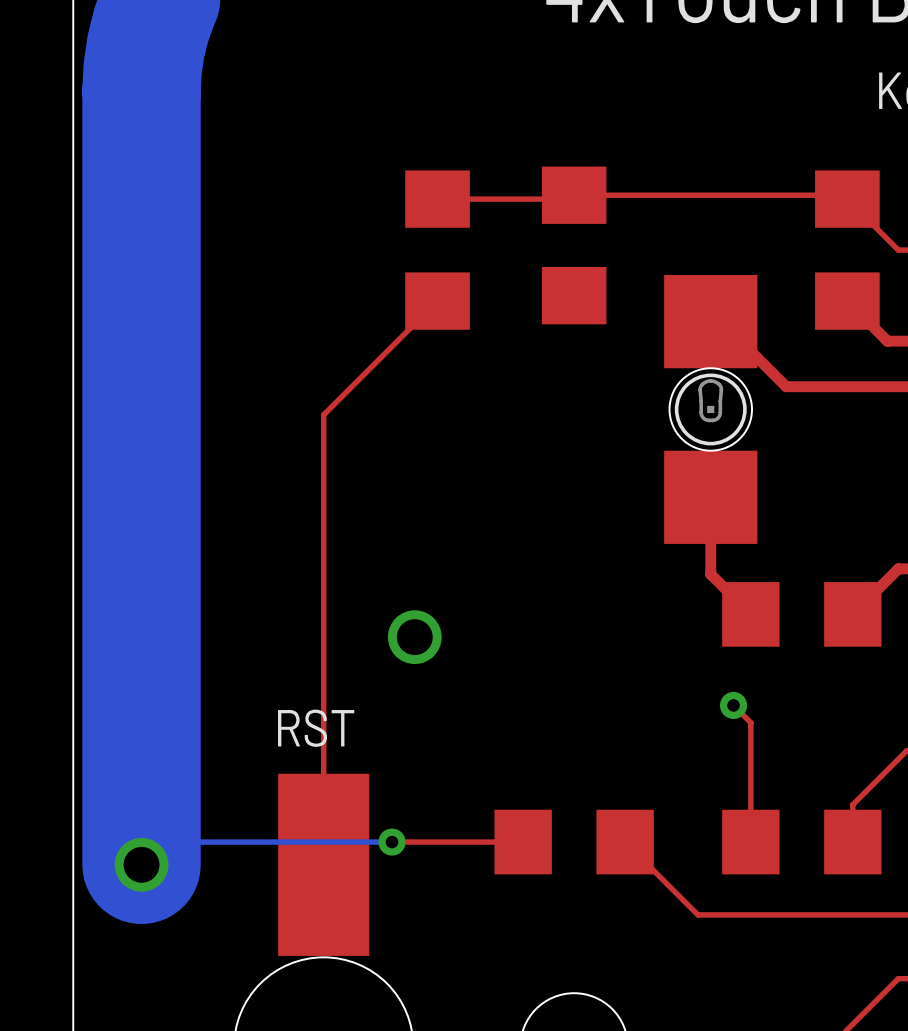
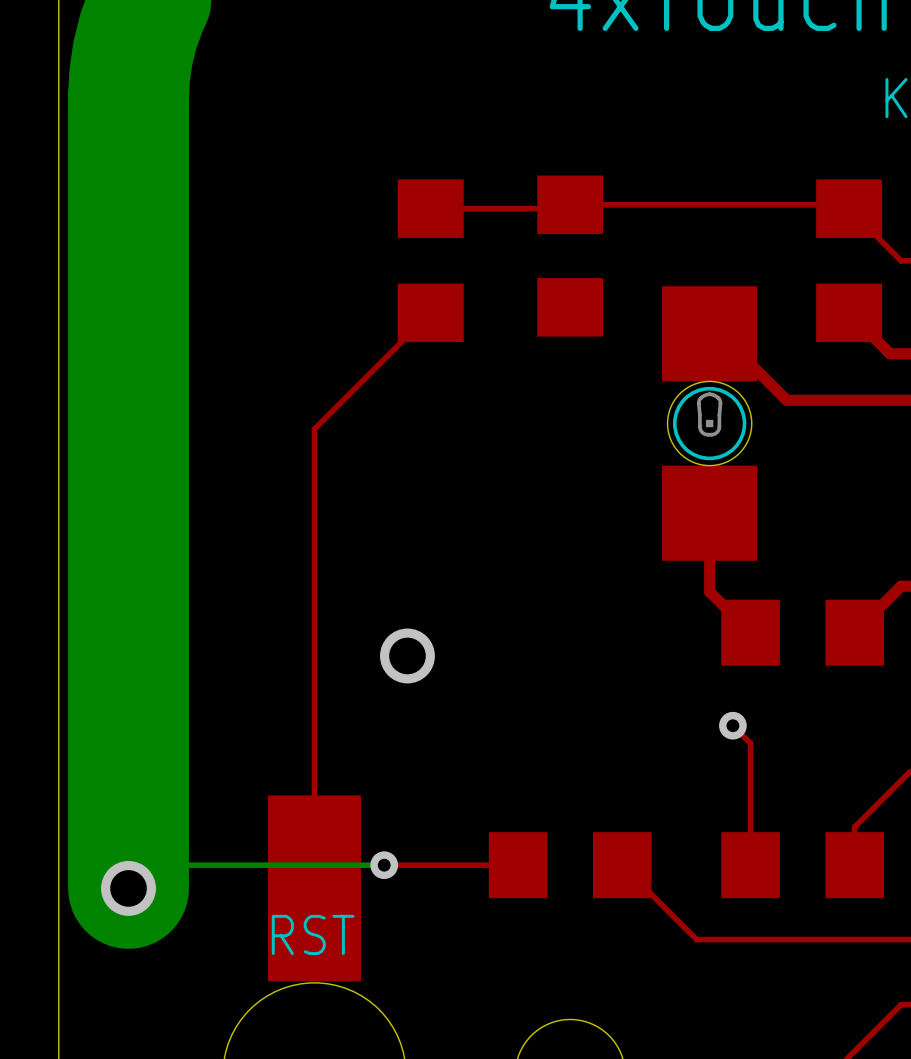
text position: RST (316, 728) -> RST (313, 934)

